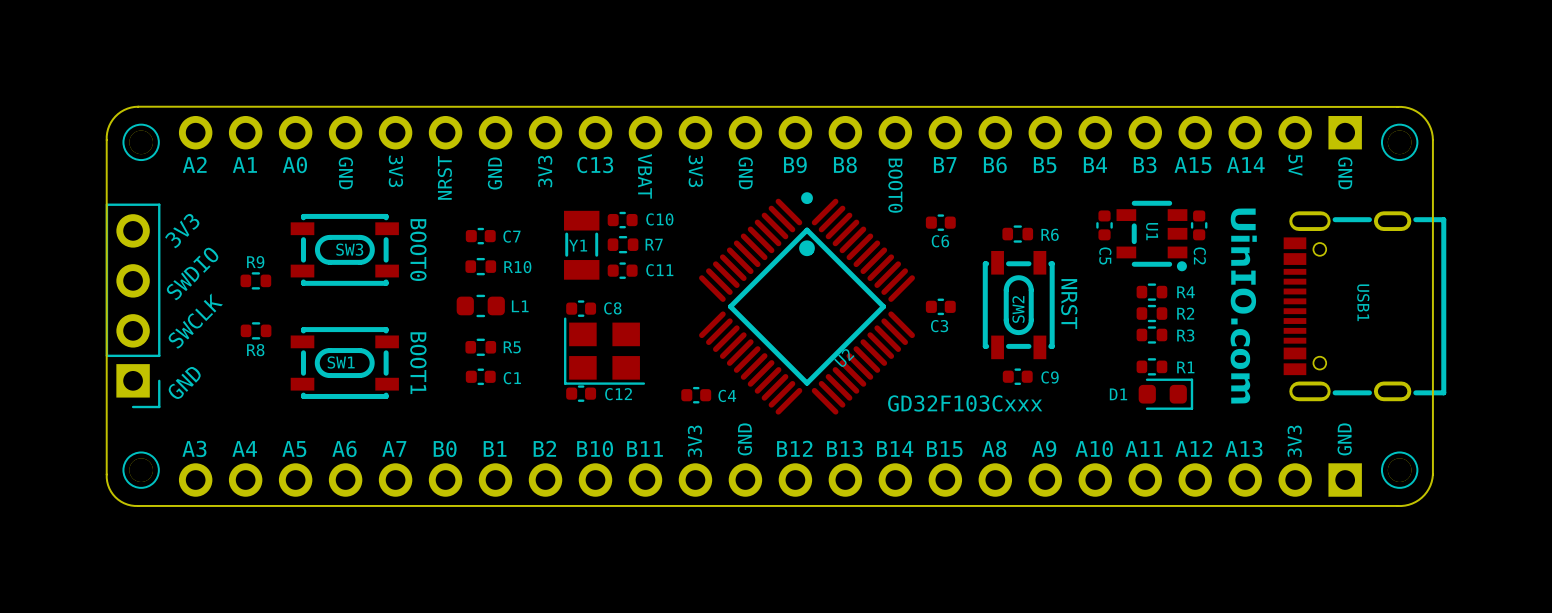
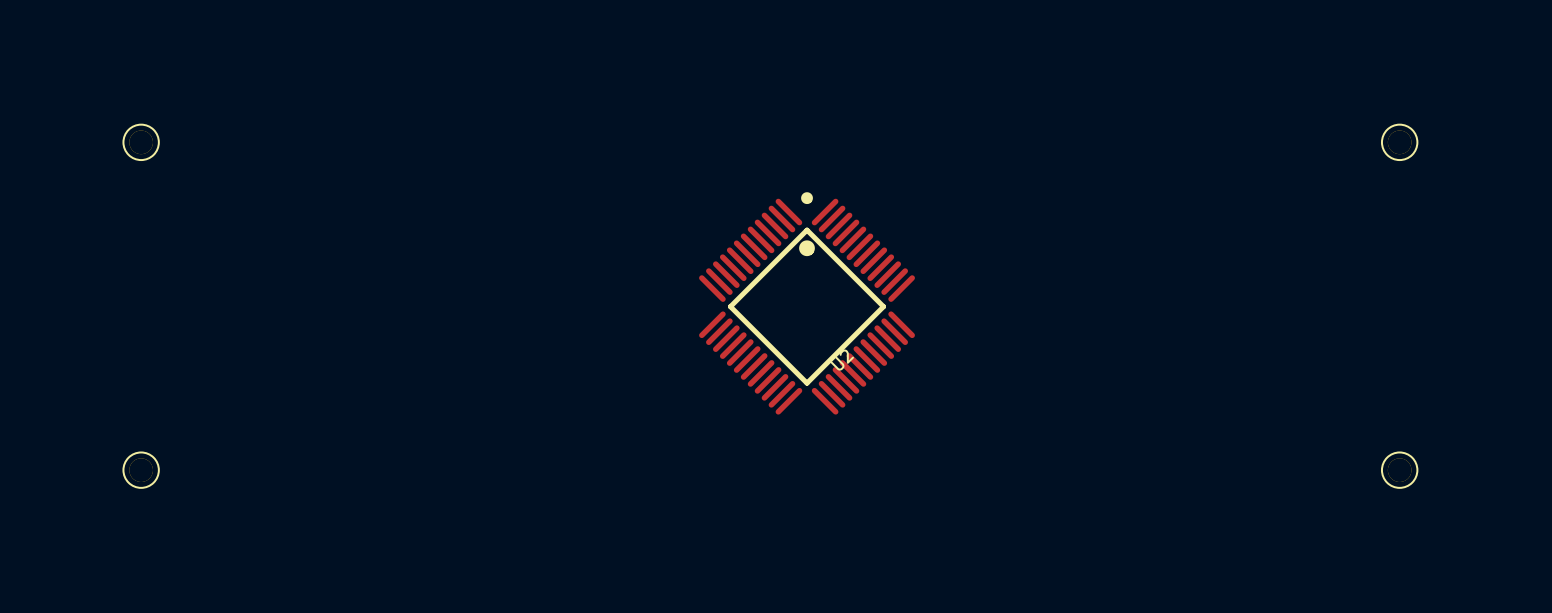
board edge: (138, 106) (1409, 108) (1425, 118) (1430, 128) (1432, 139) (1431, 481) (1421, 497) (1412, 503) (1401, 506) (127, 504) (113, 494) (106, 478) (106, 136) (109, 125) (115, 116) (124, 110) (138, 106) -> none
part: (770, 132) -> none
text: A2 (194, 164) -> none
text: A1 (244, 164) -> none
text: A0 (294, 164) -> none
text: C13 (595, 164) -> none
text: B9 (795, 164) -> none
text: B8 (845, 164) -> none
text: B7 (945, 164) -> none
text: B6 (995, 164) -> none
text: B4 (1095, 164) -> none
text: B3 (1145, 164) -> none
text: A14 (1245, 164) -> none
text: B5 (1045, 165) -> none
text: A15 (1192, 165) -> none
text: 5V (1295, 165) -> none
text: 3V3 (395, 171) -> none
text: 3V3 (545, 171) -> none
text: 3V3 (695, 171) -> none
text: GND (345, 173) -> none
text: GND (495, 173) -> none
text: GND (745, 173) -> none
text: GND (1345, 173) -> none
text: VBAT (645, 176) -> none
text: NRST (444, 177) -> none
text: BOOT0 (895, 185) -> none
drawing: [1230, 208, 1257, 404] -> none
C10: (622, 220) -> none
C6: (940, 222) -> none
C5: (1104, 225) -> none
C2: (1199, 225) -> none
text: 3V3 (182, 231) -> none
R6: (1017, 234) -> none
C7: (480, 236) -> none
U1: (1151, 236) -> none
R7: (623, 244) -> none
Y1: (581, 245) -> none
SW3: (344, 249) -> none
text: BOOT0 (418, 250) -> none
R10: (480, 266) -> none
C11: (622, 270) -> none
text: SWDIO (192, 273) -> none
R9: (255, 280) -> none
R4: (1151, 292) -> none
text: NRST (1069, 304) -> none
part: (133, 305) -> none
L1: (480, 305) -> none
SW2: (1018, 305) -> none
C3: (940, 306) -> none
USB1: (1364, 306) -> none
C8: (581, 308) -> none
R2: (1151, 313) -> none
text: SWCLK (195, 321) -> none
R8: (256, 330) -> none
R3: (1151, 334) -> none
R5: (480, 347) -> none
part: (604, 351) -> none
SW1: (344, 363) -> none
text: BOOT1 (418, 363) -> none
R1: (1151, 366) -> none
C1: (480, 376) -> none
C9: (1017, 376) -> none
text: GND (184, 383) -> none
C12: (581, 393) -> none
D1: (1165, 394) -> none
C4: (696, 395) -> none
text: GD32F103Cxxx (965, 403) -> none
text: GND (744, 439) -> none
text: GND (1344, 439) -> none
text: 3V3 (694, 441) -> none
text: 3V3 (1294, 441) -> none
text: A3 (194, 448) -> none
text: A4 (244, 448) -> none
text: A6 (344, 448) -> none
text: A7 (394, 448) -> none
text: B0 (445, 448) -> none
text: B1 (495, 448) -> none
text: B2 (544, 448) -> none
text: B10 (595, 448) -> none
text: B11 (645, 448) -> none
text: B12 (794, 448) -> none
text: B13 (844, 448) -> none
text: B14 (895, 448) -> none
text: A8 (994, 448) -> none
text: A9 (1044, 448) -> none
text: A10 (1094, 448) -> none
text: A11 (1144, 448) -> none
text: A12 (1193, 448) -> none
text: A13 (1244, 448) -> none
text: A5 (294, 449) -> none
text: B15 (944, 449) -> none
part: (770, 480) -> none

